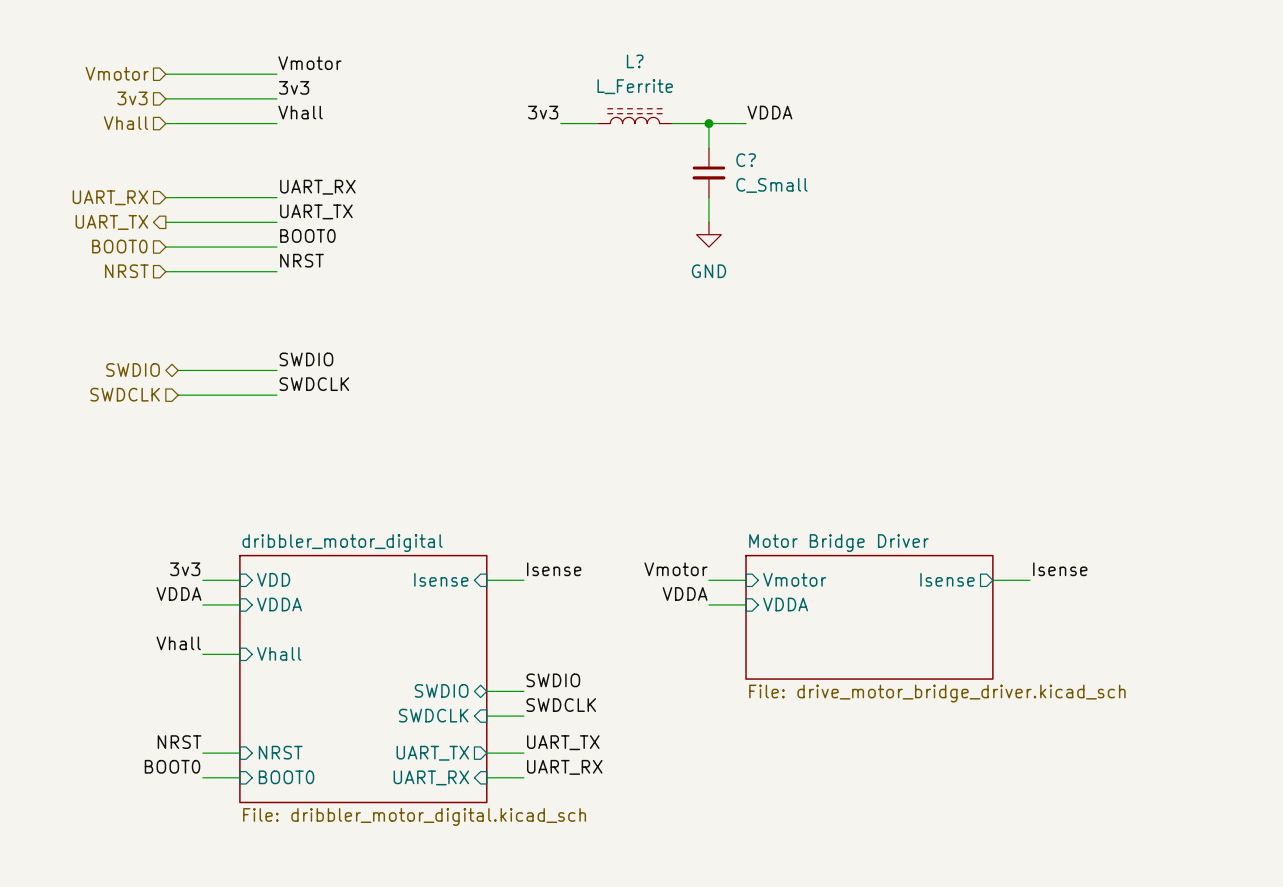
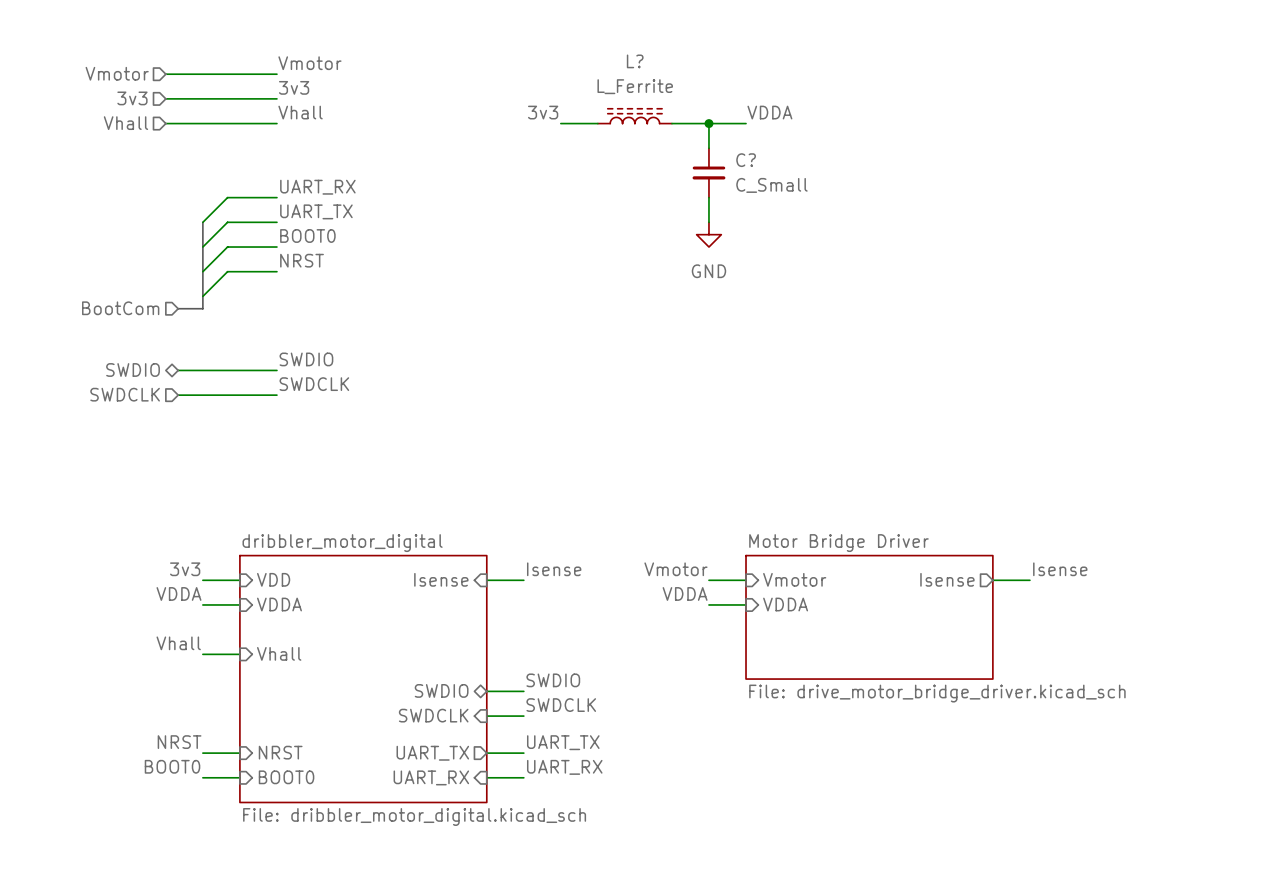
hierarchical label: UART_RX (110, 197) -> none
wire: (165, 197) (227, 197) -> (202, 222) (227, 197)
hierarchical label: UART_TX (111, 222) -> none
wire: (165, 222) (227, 222) -> (202, 247) (227, 222)
bus: none -> (202, 222) (202, 308) (178, 308)
hierarchical label: BOOT0 (119, 246) -> none
wire: (165, 247) (227, 247) -> (202, 271) (227, 247)
hierarchical label: NRST (126, 271) -> none
wire: (165, 271) (227, 271) -> (202, 296) (227, 271)
hierarchical label: none -> BootCom (120, 308)

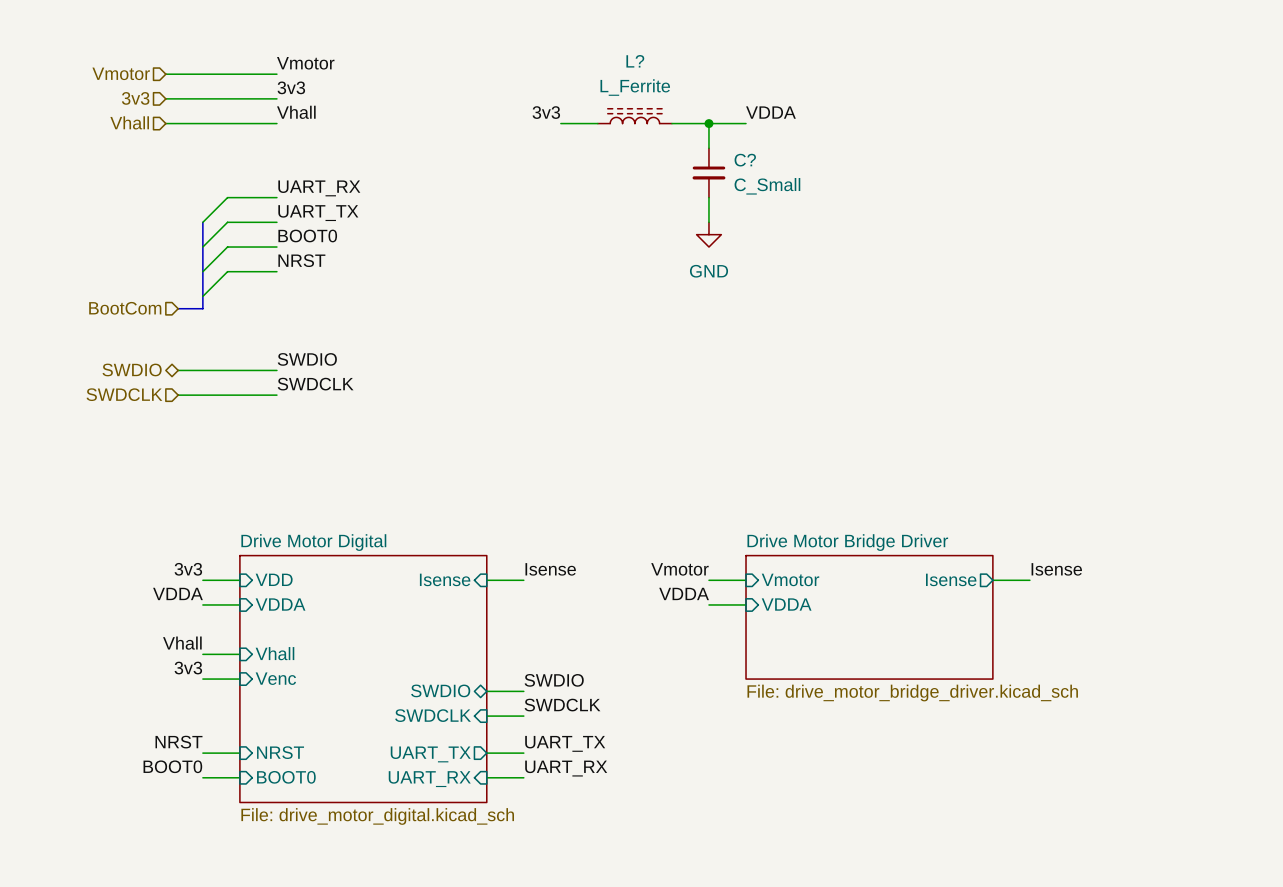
sheet dribbler_motor_digital name: dribbler_motor_digital (342, 543) -> Drive Motor Digital (313, 542)
sheet Motor Bridge Driver name: Motor Bridge Driver (838, 543) -> Drive Motor Bridge Driver (847, 542)
label: none -> 3v3 (188, 668)
sheet pin: none -> Venc (275, 678)
wire: none -> (202, 679) (239, 679)
sheet dribbler_motor_digital value: File: dribbler_motor_digital.kicad_sch (414, 816) -> File: drive_motor_digital.kicad_sch (377, 816)

